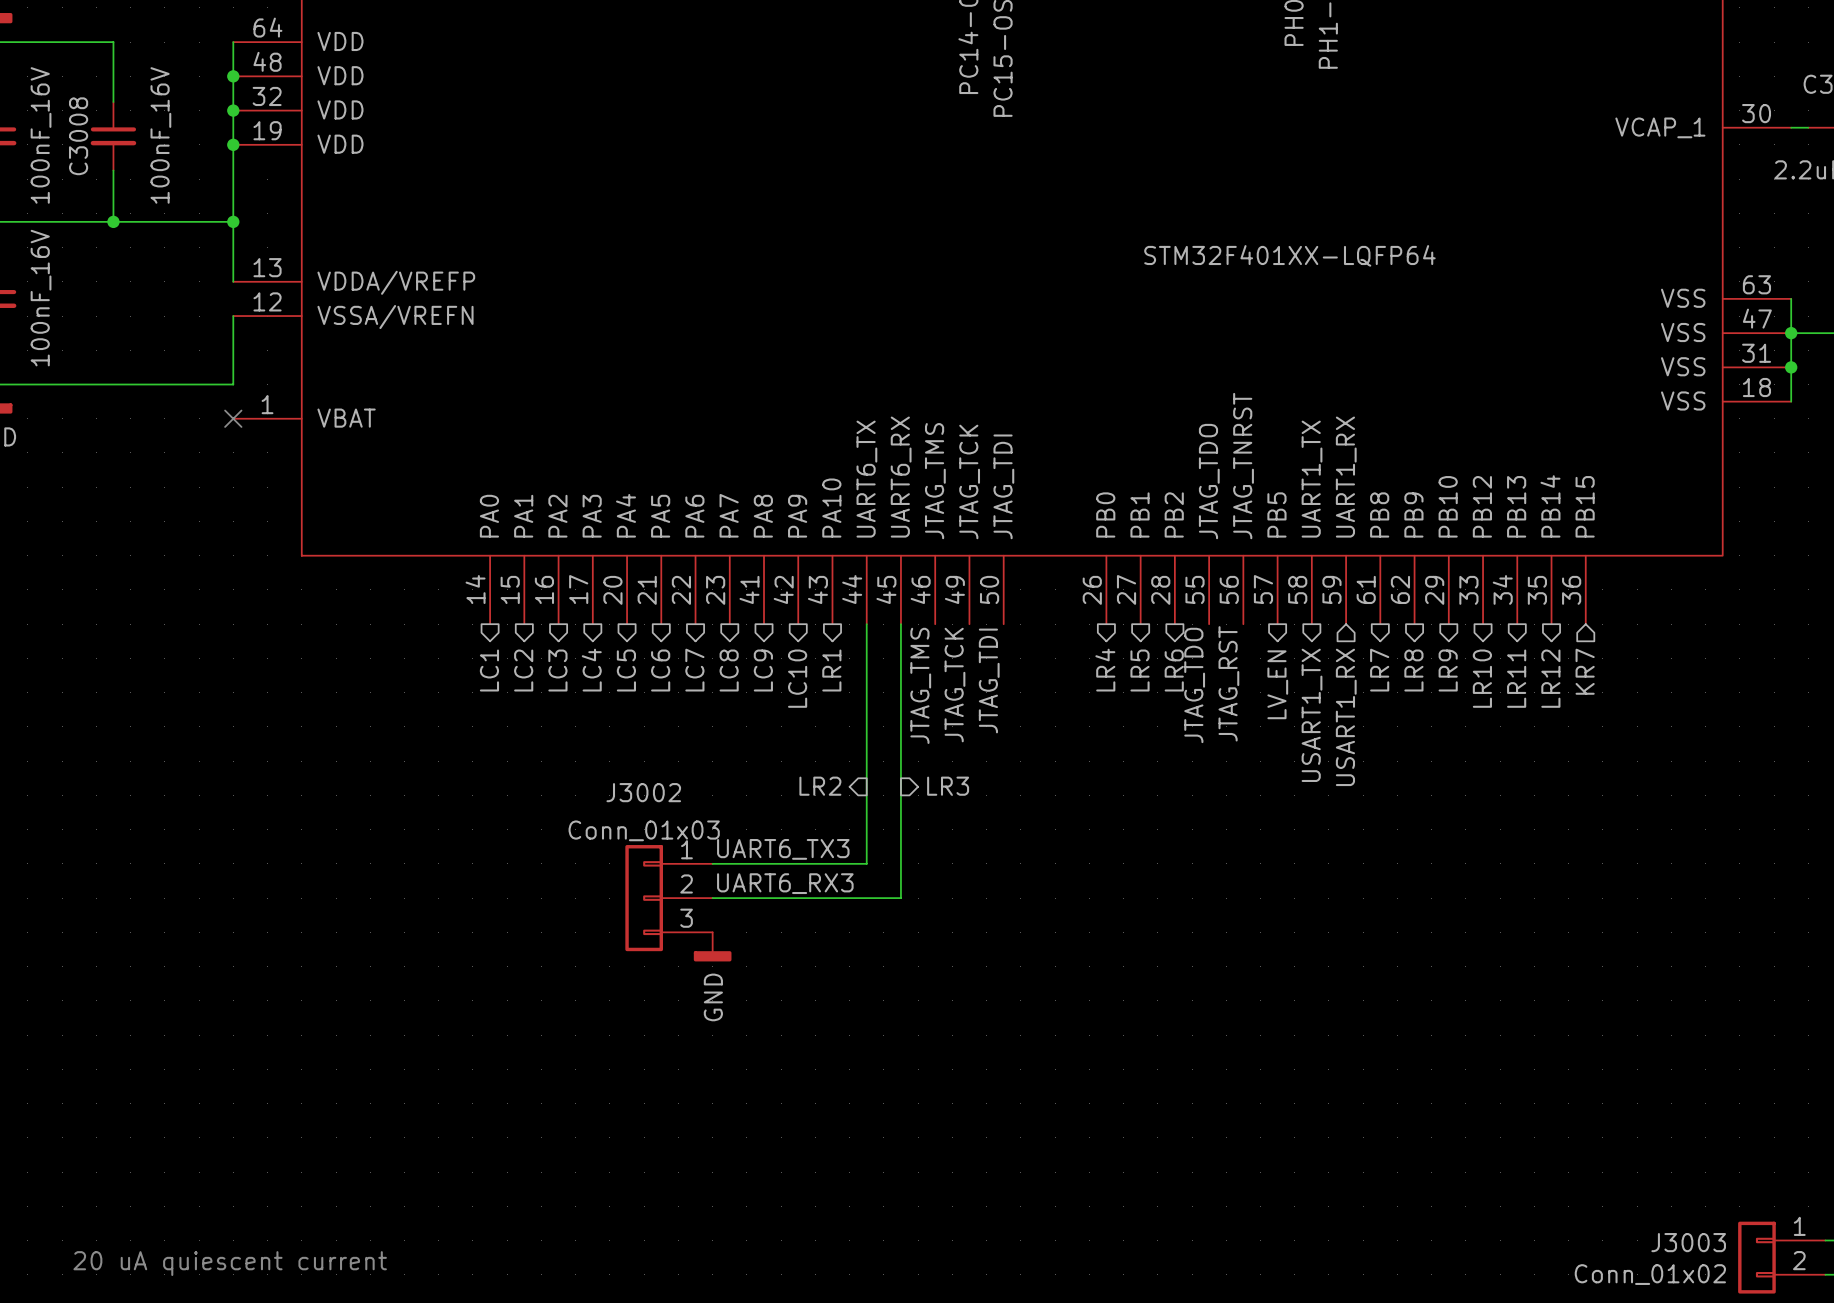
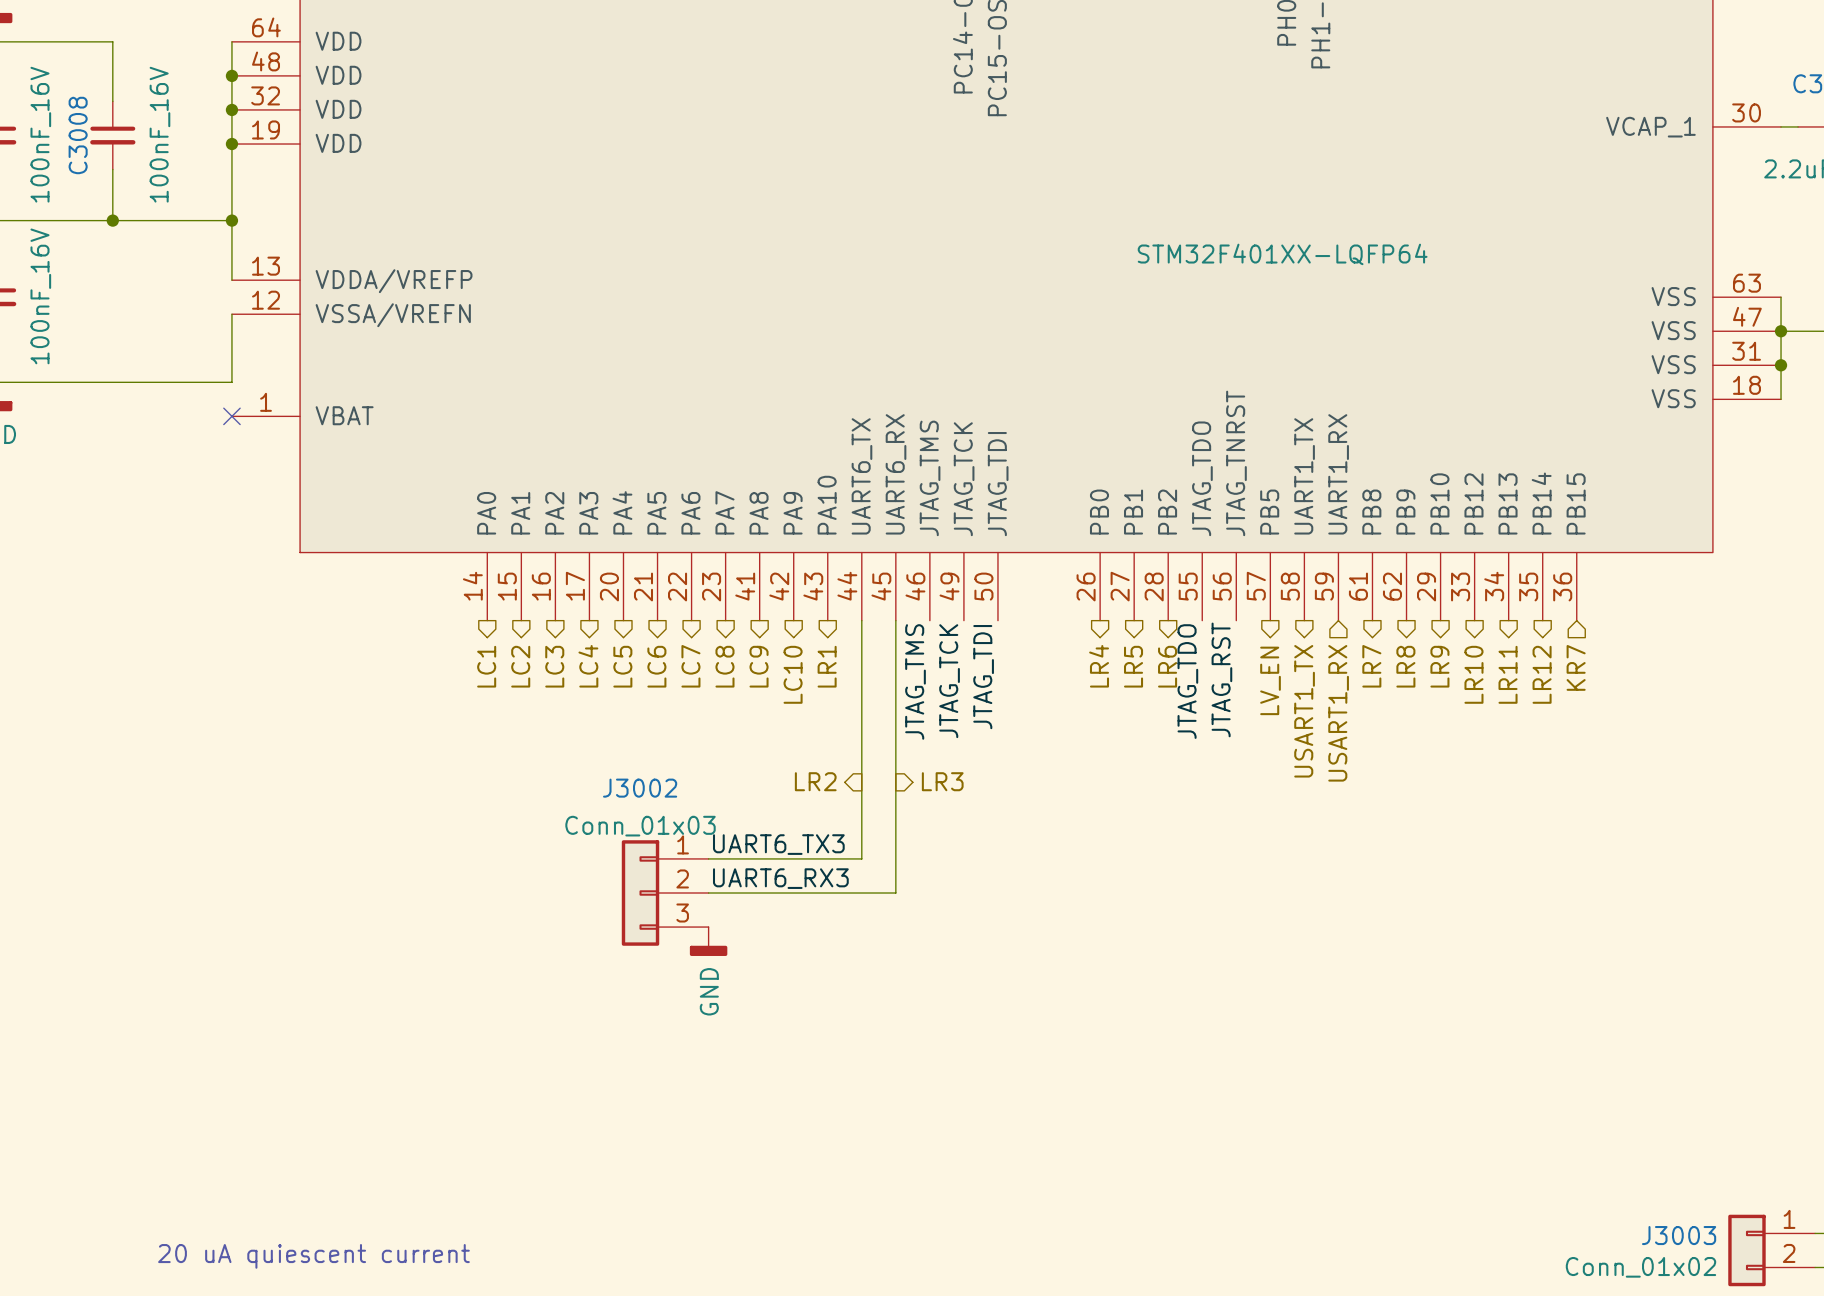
text position: 20 uA quiescent current (230, 1263) -> 20 uA quiescent current (313, 1256)

